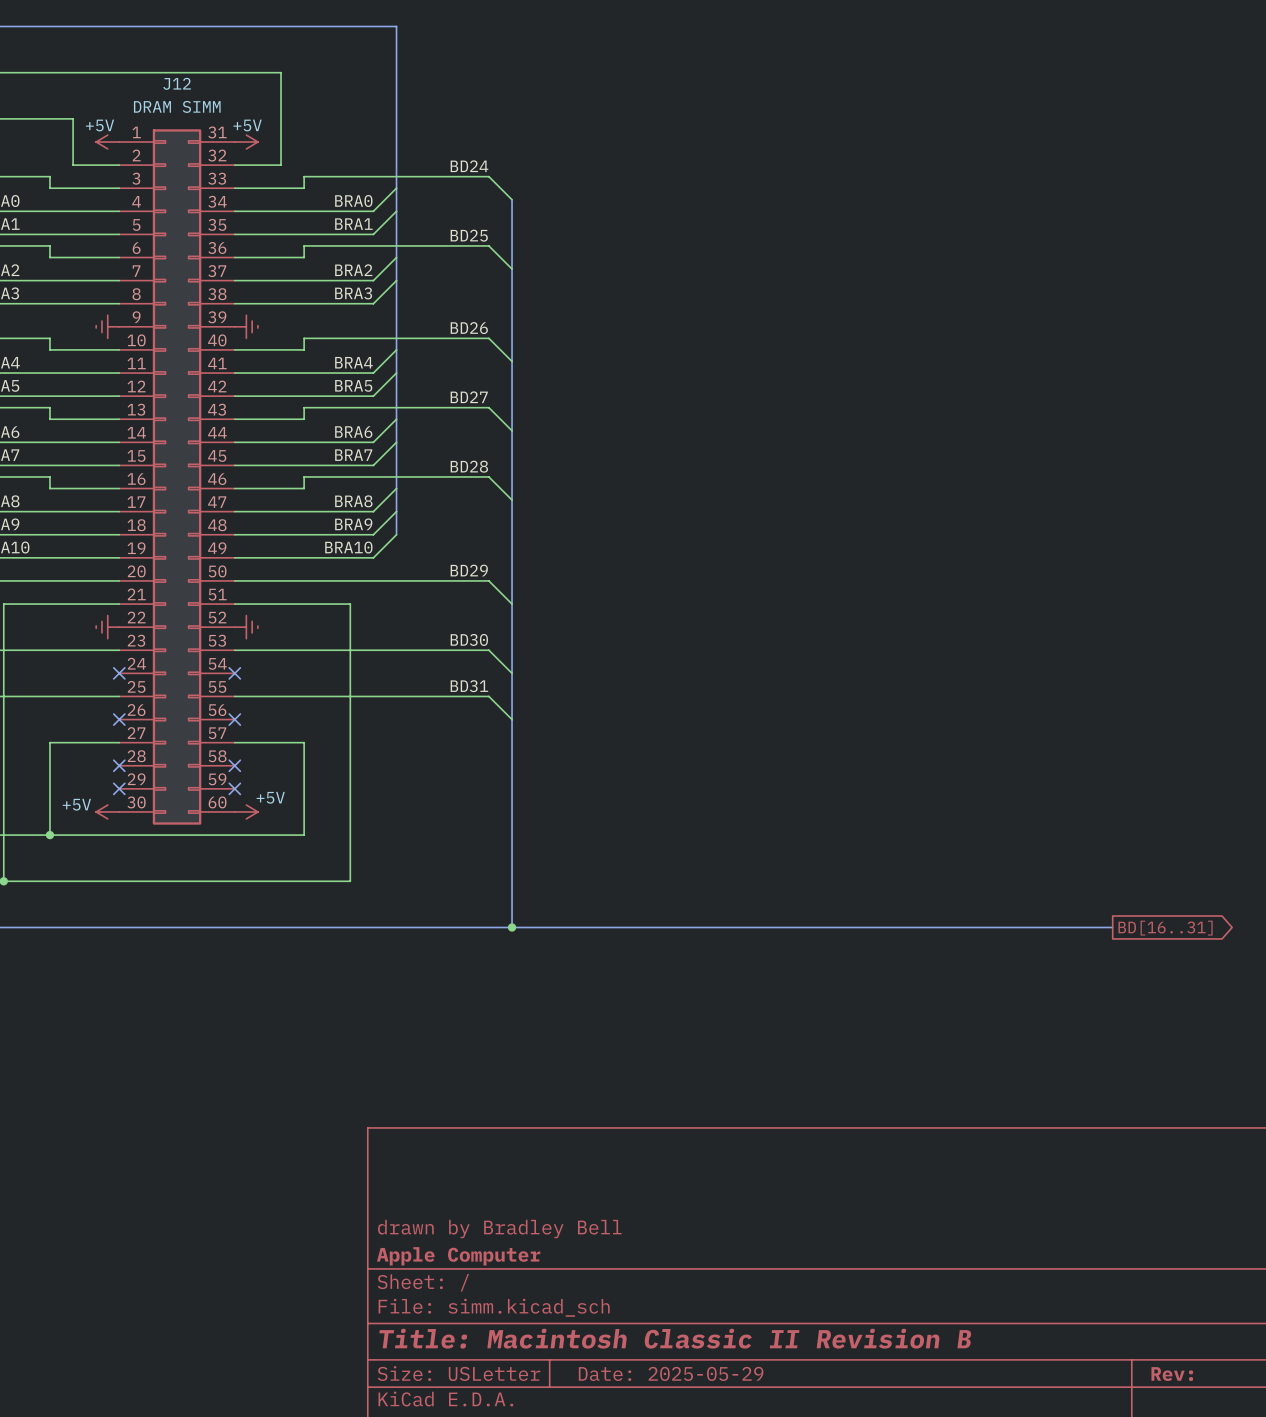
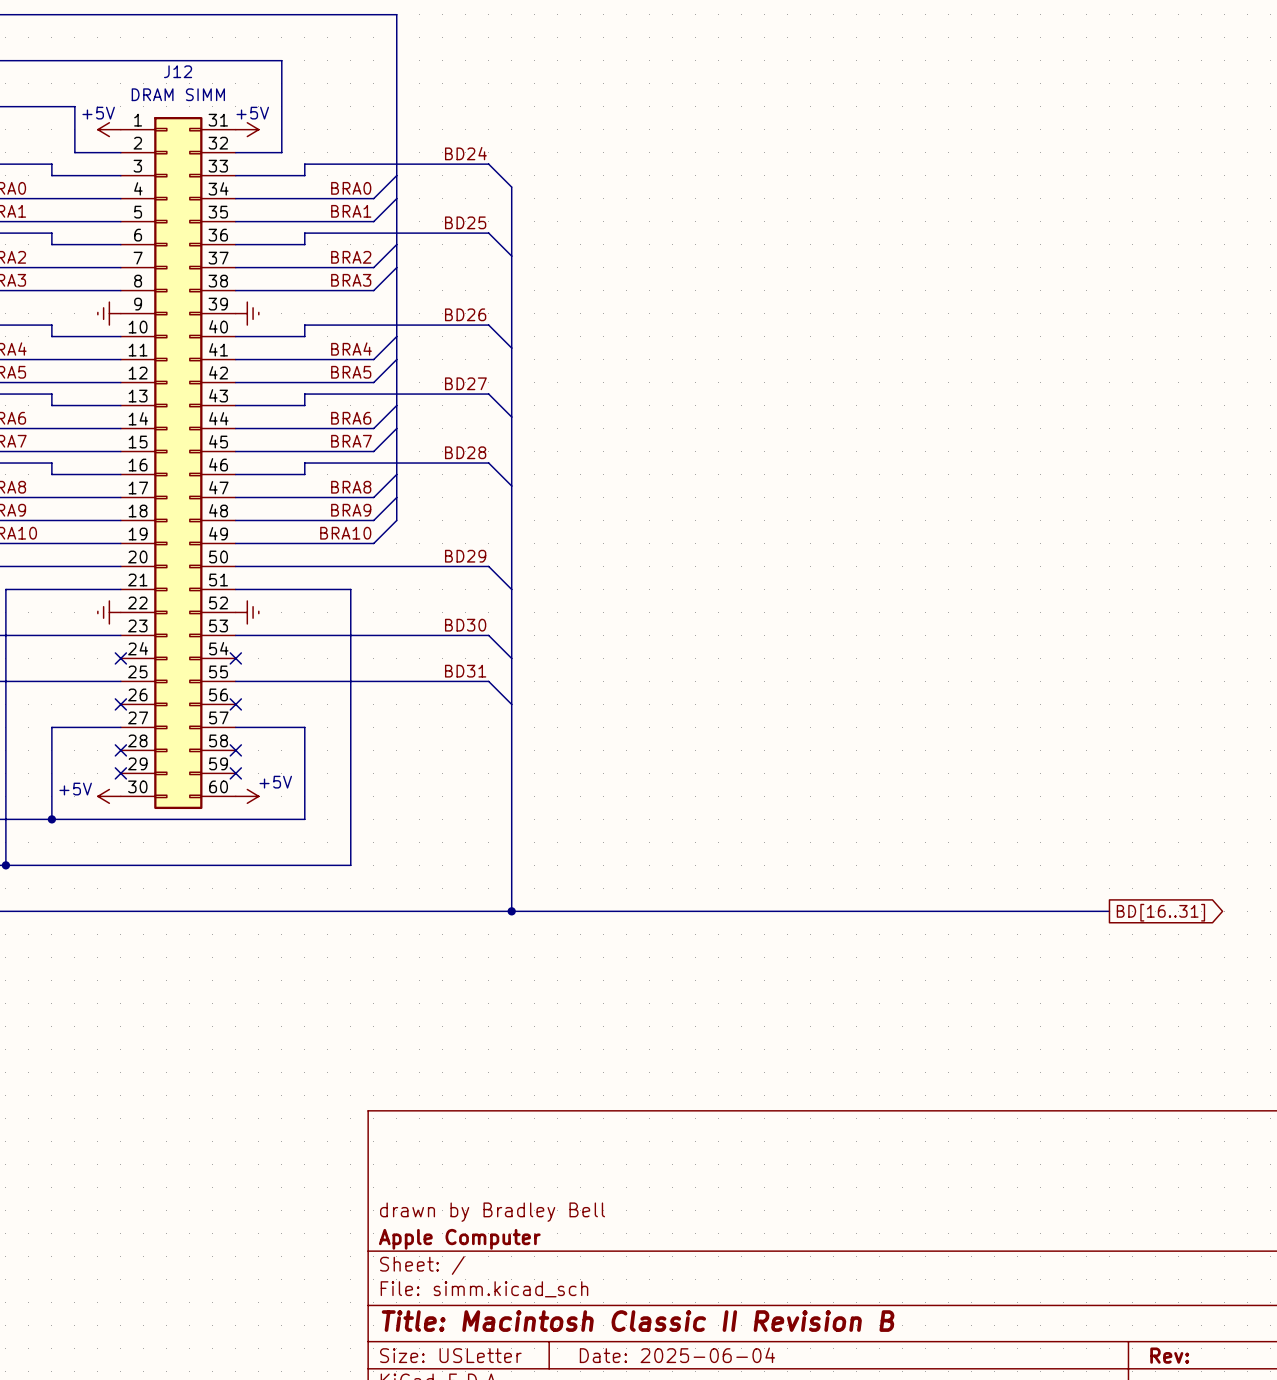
title block: Date: 2025-05-29 (671, 1373) -> Date: 2025-06-04 (677, 1355)

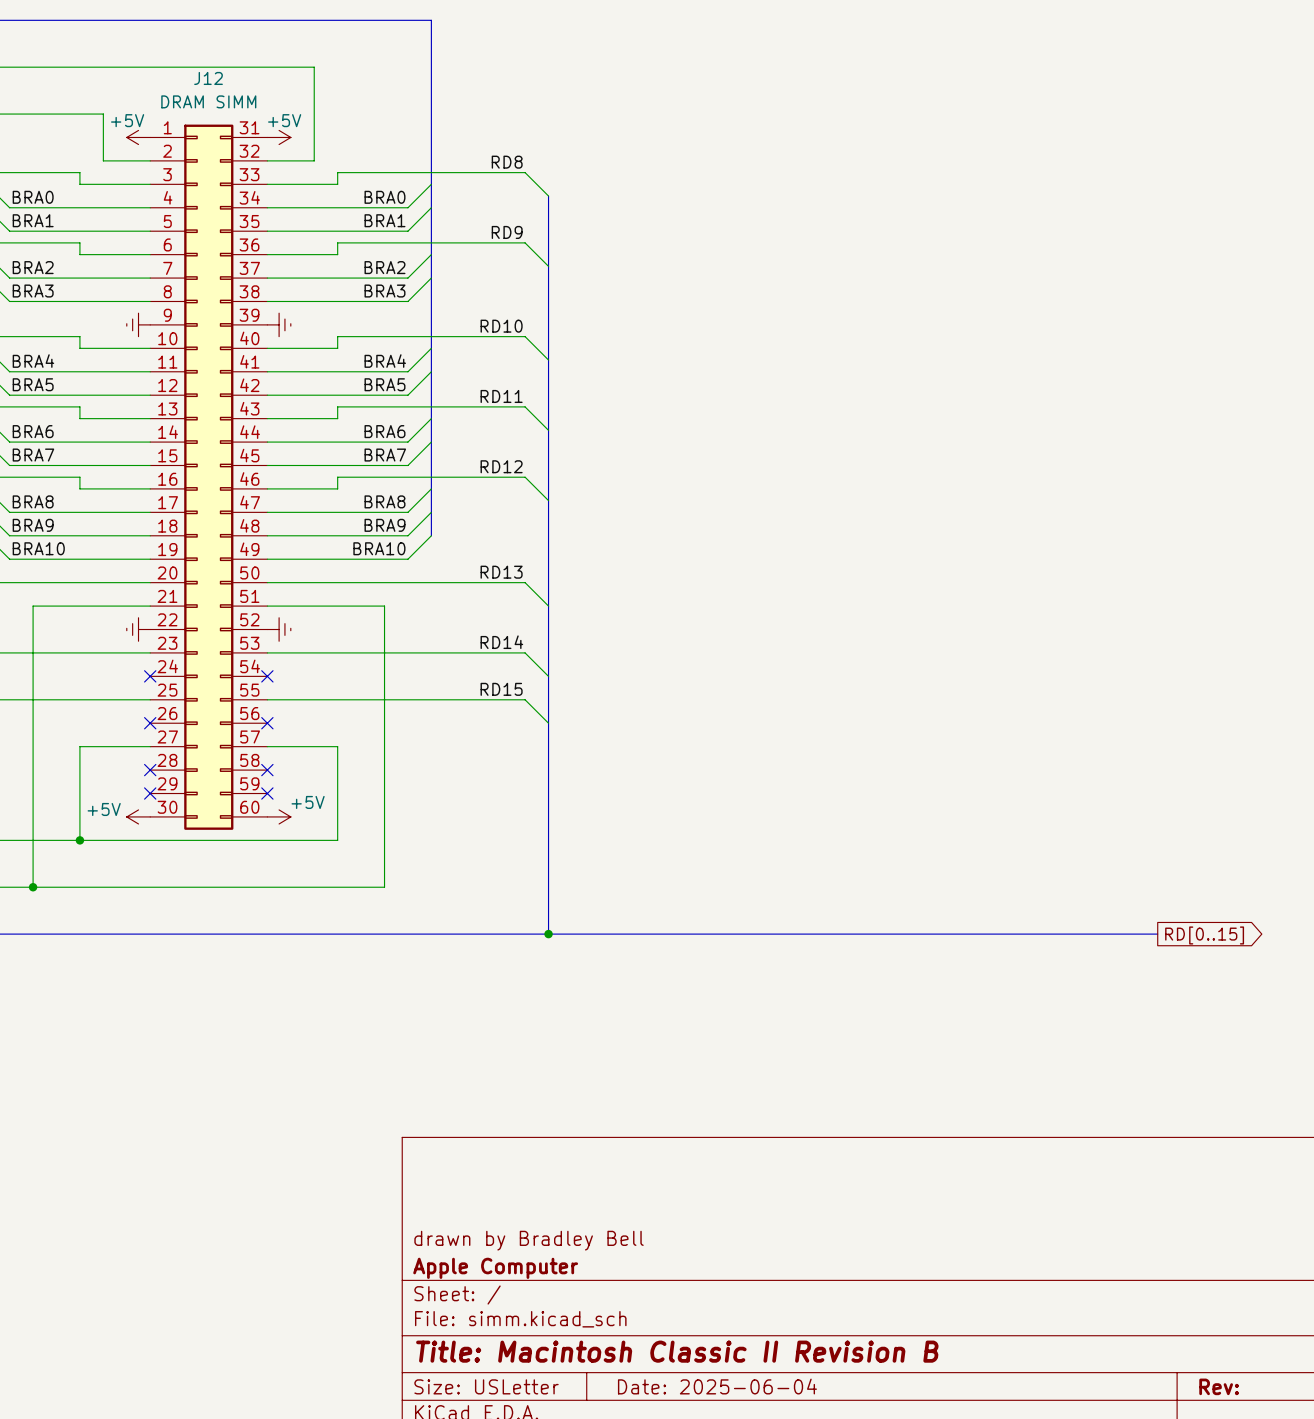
label: BD24 (465, 153) -> RD8 (507, 162)
label: BD25 (465, 222) -> RD9 (507, 232)
label: BD26 (465, 314) -> RD10 (501, 326)
label: BD27 (465, 383) -> RD11 (501, 396)
label: BD28 (465, 452) -> RD12 (501, 466)
label: BD29 (465, 556) -> RD13 (501, 572)
label: BD30 (465, 625) -> RD14 (501, 642)
label: BD31 (465, 671) -> RD15 (501, 689)
global label: BD[16..31] (1160, 912) -> RD[0..15] (1204, 935)

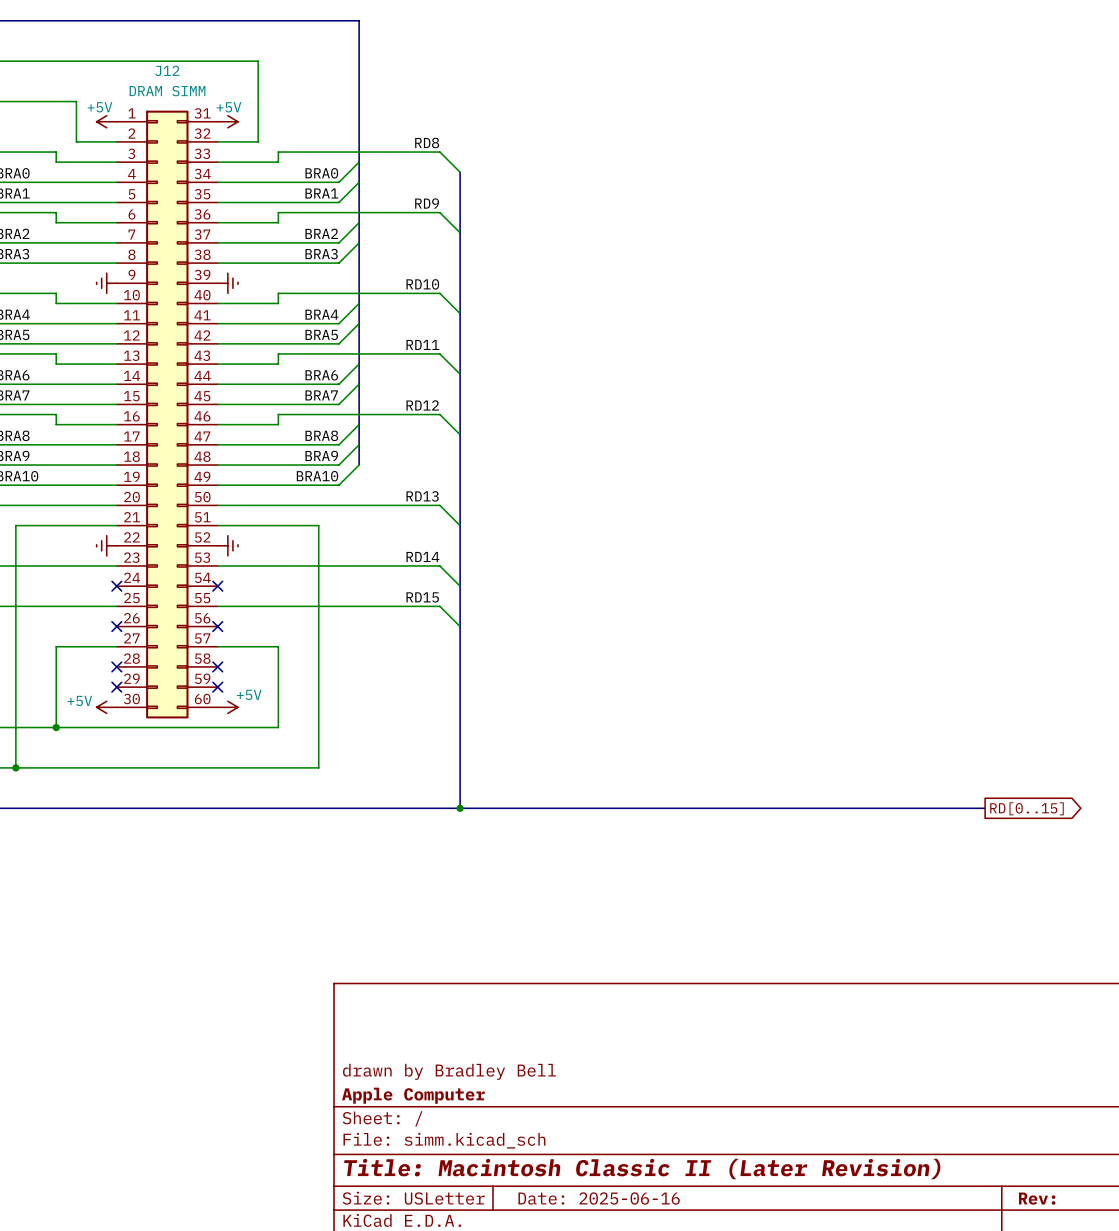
title block: Title: Macintosh Classic II Revision B (677, 1351) -> Title: Macintosh Classic II (Later Revision) (642, 1169)
title block: Date: 2025-06-04 (717, 1386) -> Date: 2025-06-16 (599, 1198)

